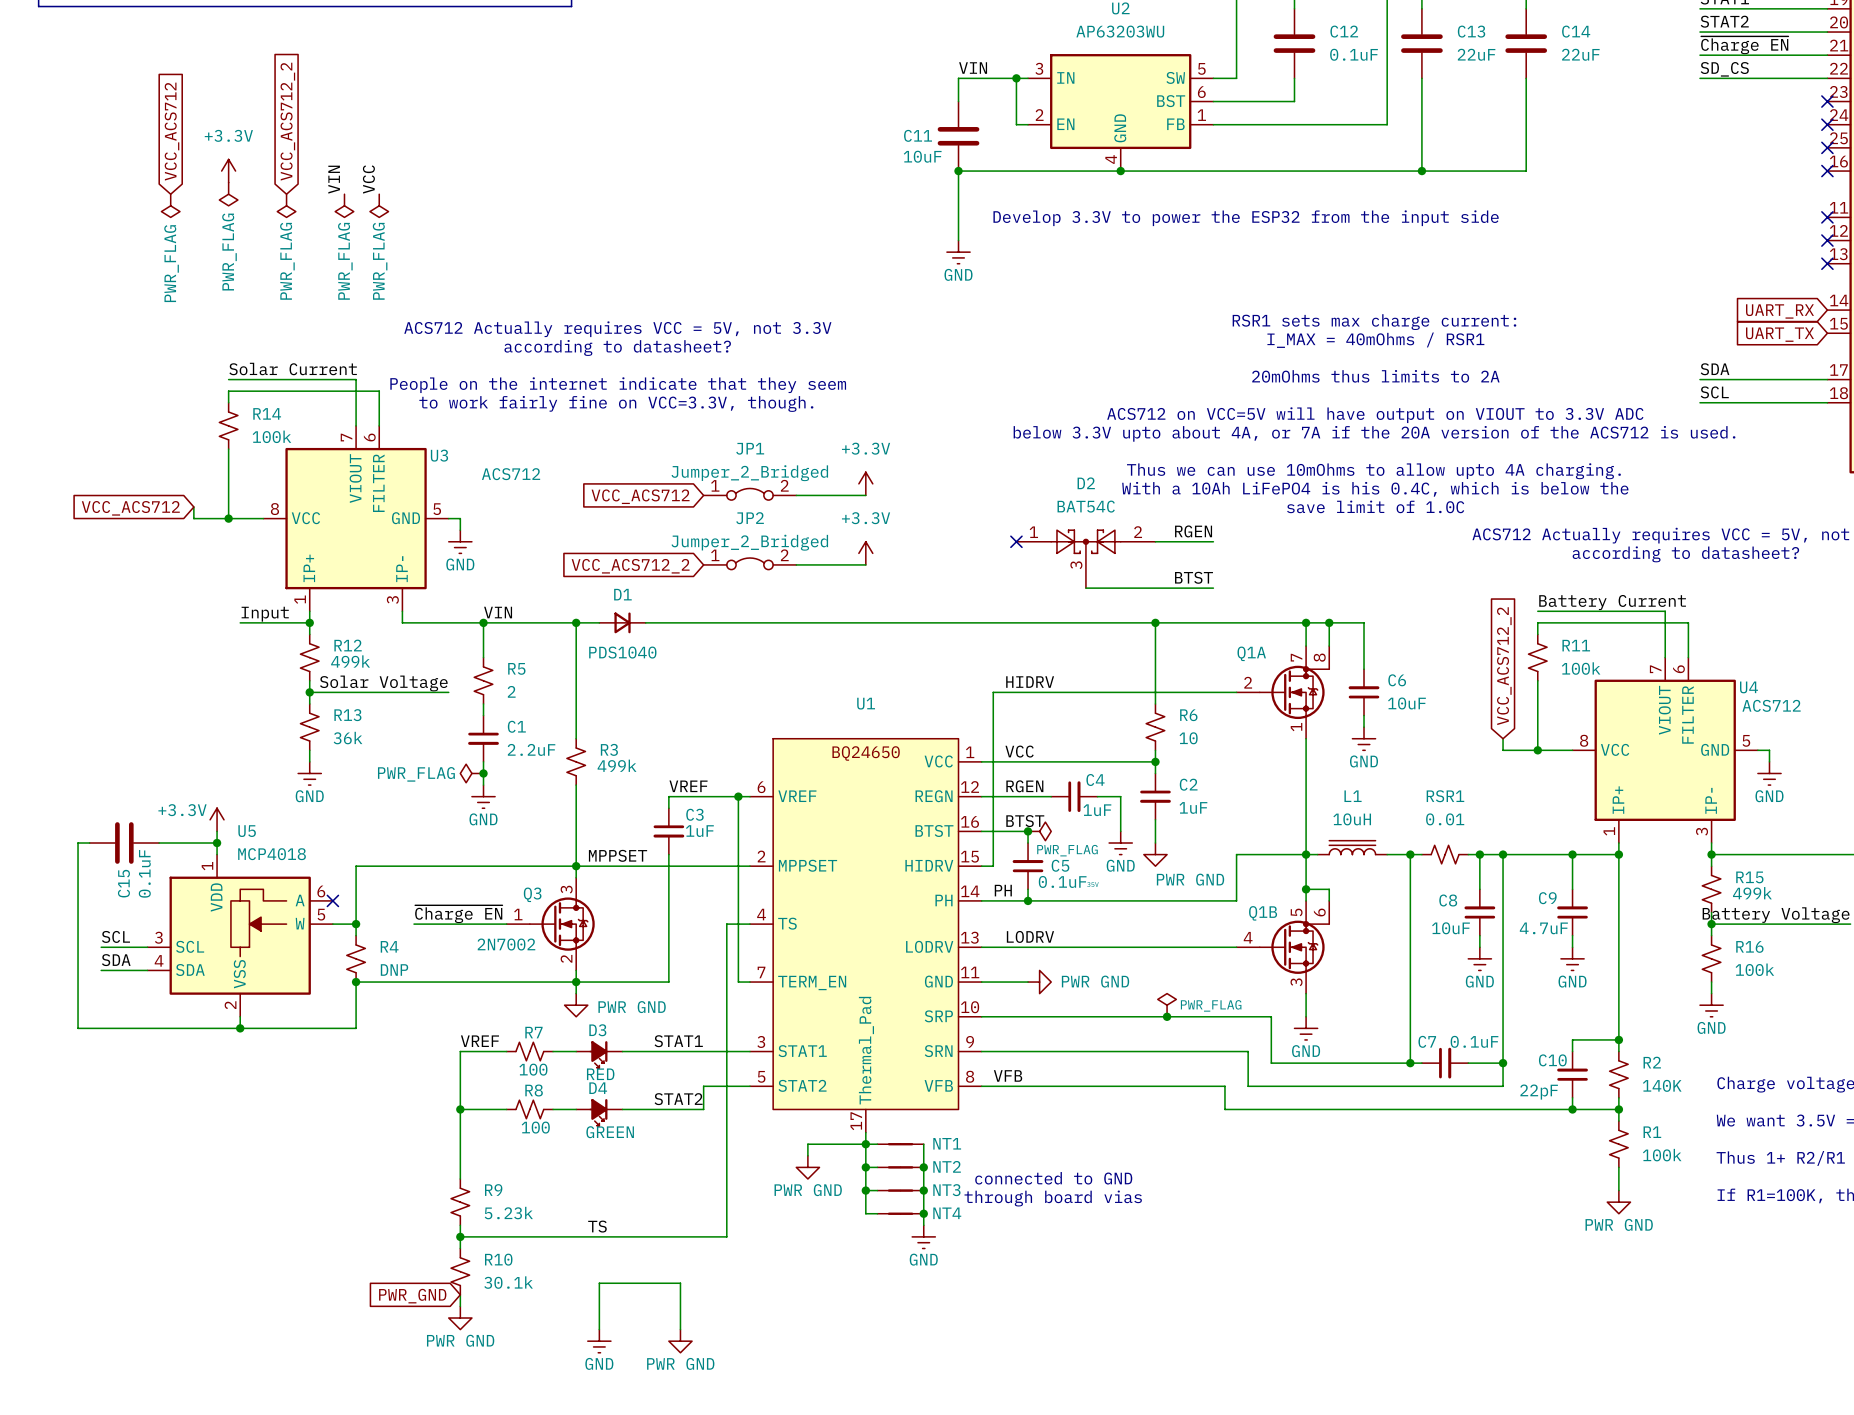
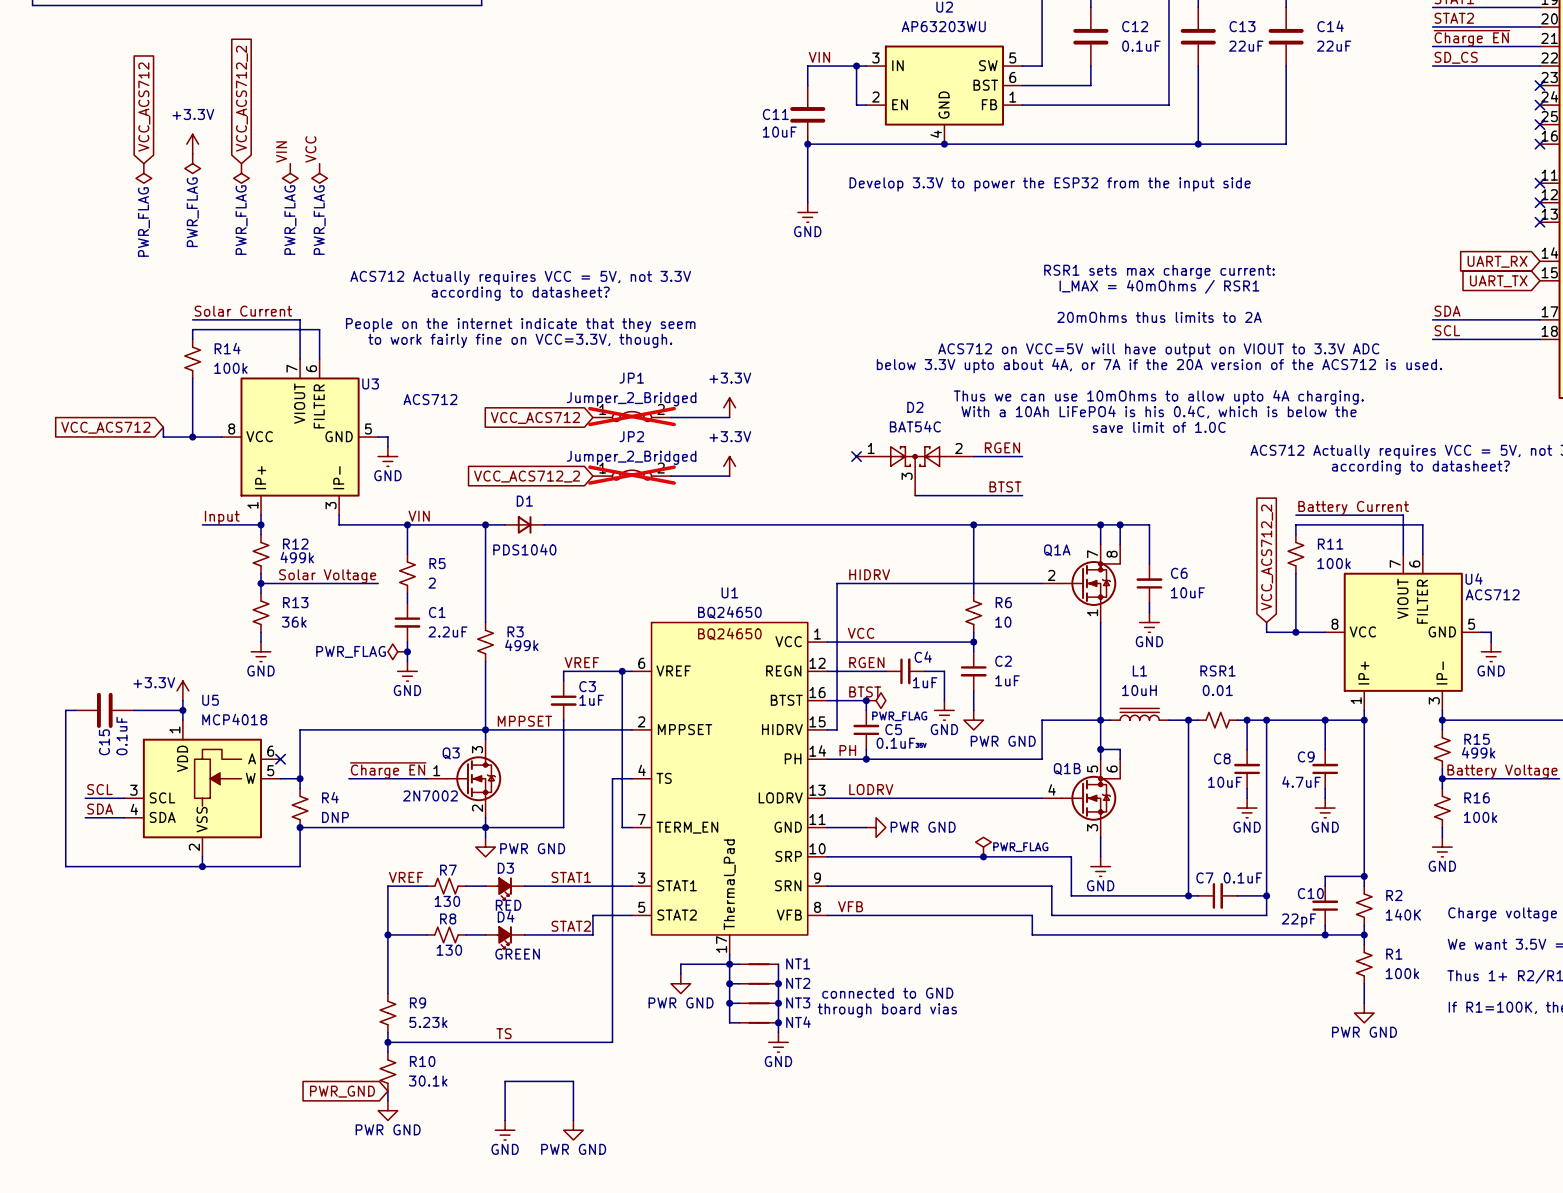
JP1 do-not-place cross: none -> (632, 416)
JP2 do-not-place cross: none -> (632, 475)
U1 value: none -> BQ24650 (729, 612)
R7 value: 100 (533, 1069) -> 130 (447, 901)
R8 value: 100 (535, 1127) -> 130 (449, 950)

